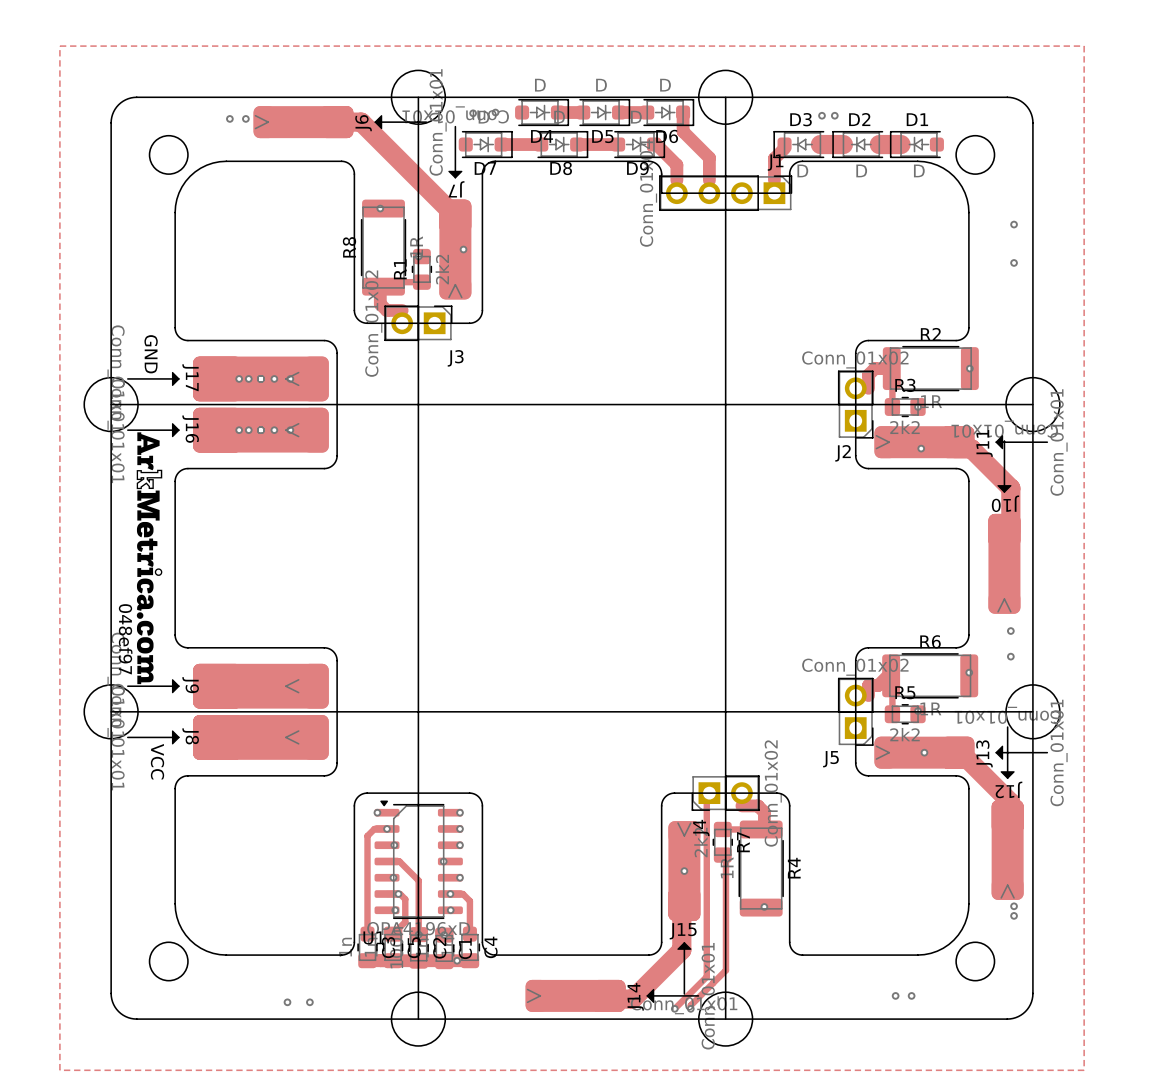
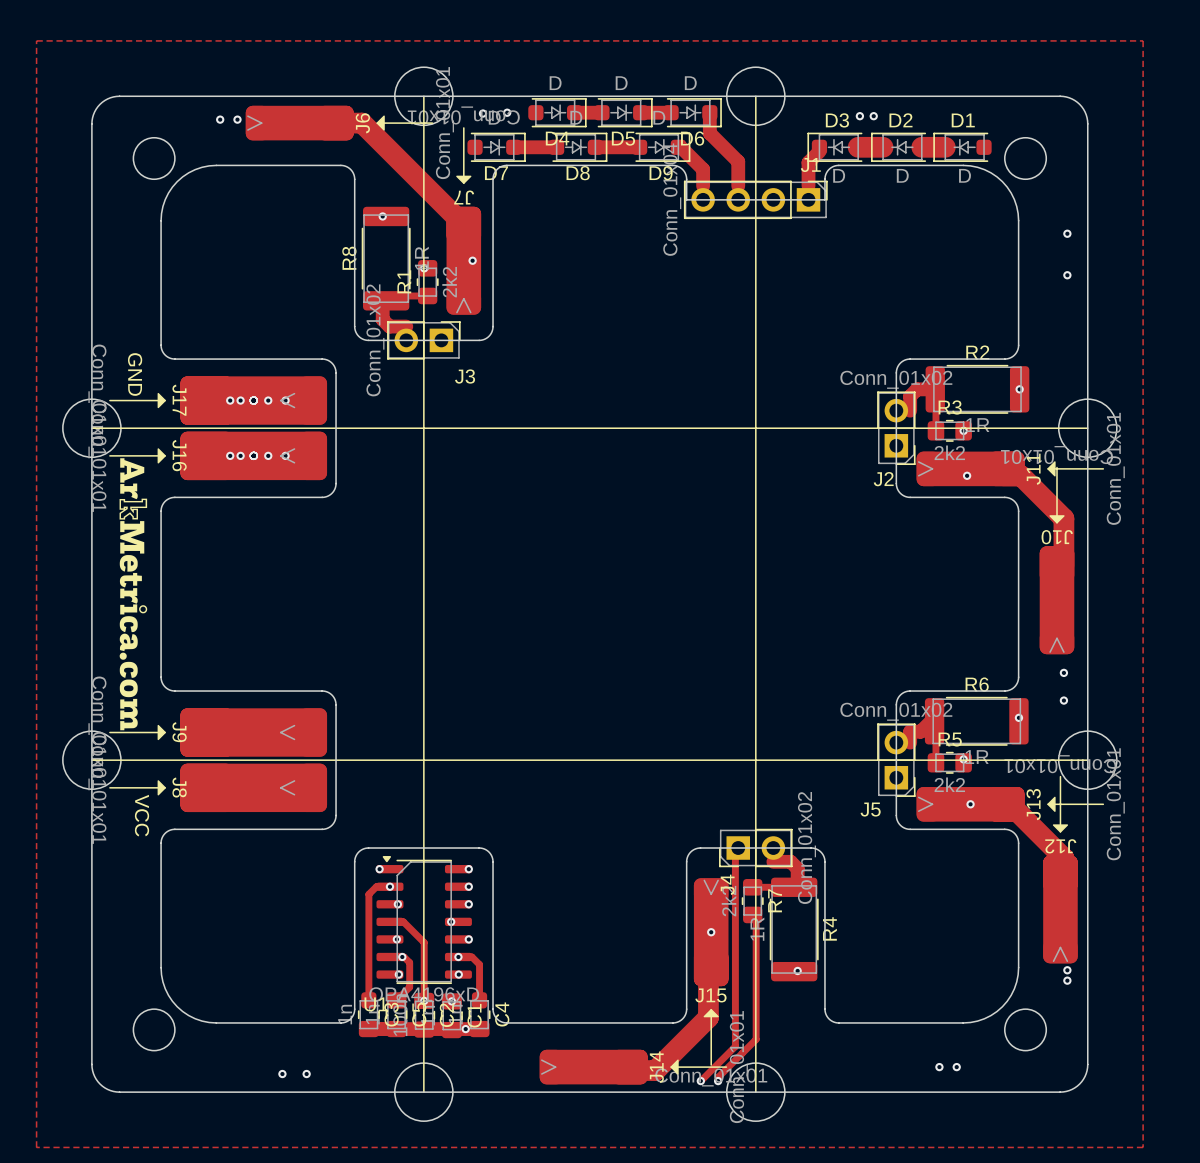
text: 048ef97 (125, 639) -> none

